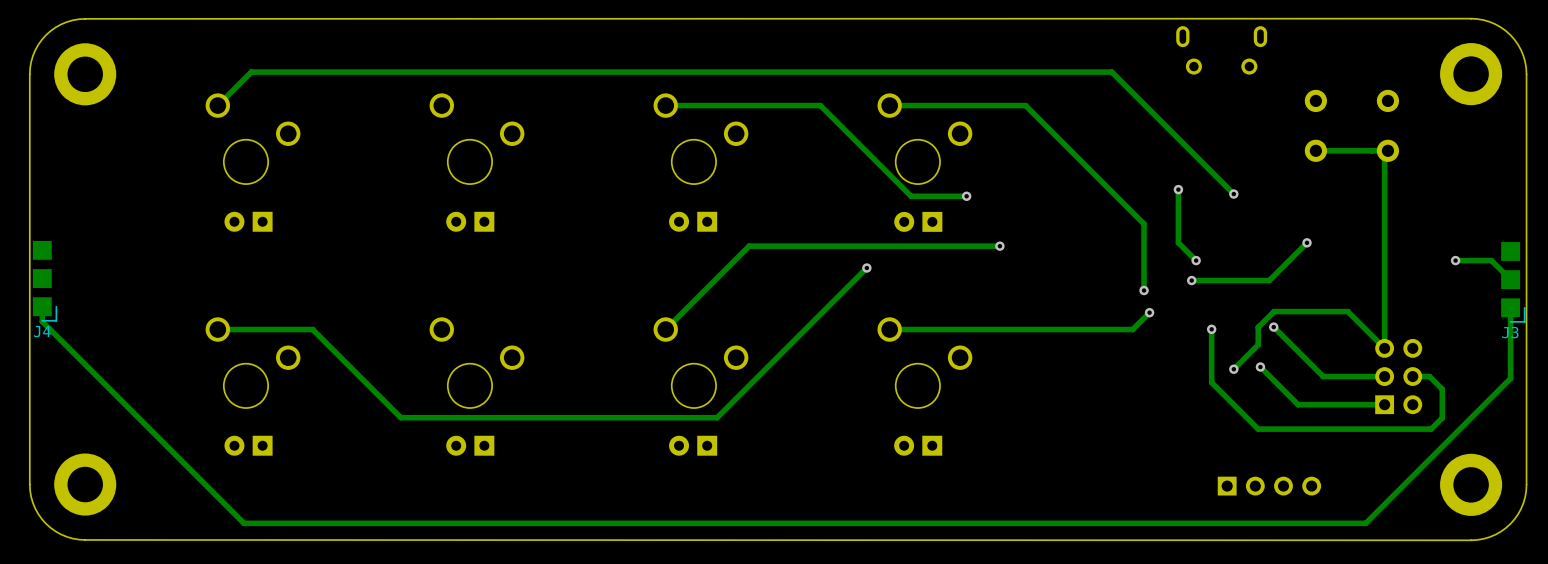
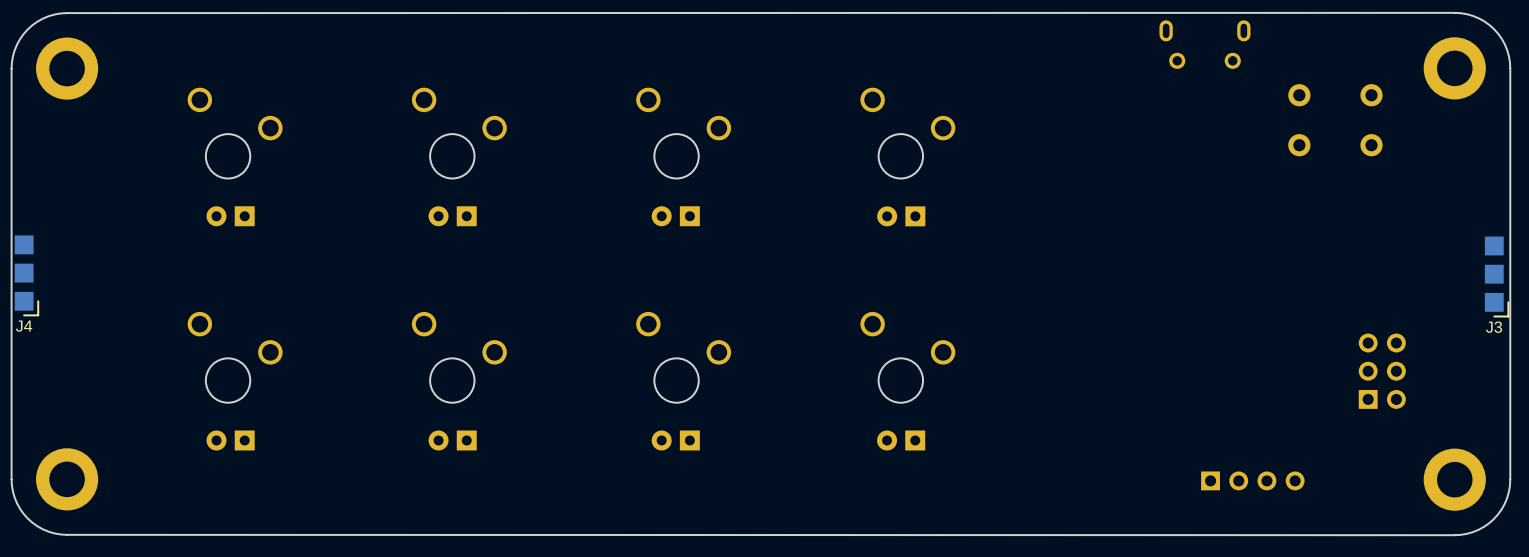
track: (217, 105) (251, 72) (1111, 72) (1233, 194) -> none
track: (665, 105) (820, 105) (911, 196) (966, 196) -> none
track: (889, 105) (1025, 105) (1144, 223) (1144, 290) -> none
track: (1315, 150) (1387, 150) (1384, 154) (1384, 348) (1347, 311) (1274, 311) (1258, 327) (1258, 344) (1233, 369) -> none
track: (1178, 189) (1178, 242) (1196, 260) -> none
via: (1178, 189) -> none
via: (1233, 194) -> none
via: (966, 196) -> none
track: (1307, 242) (1269, 280) (1191, 280) -> none
via: (1307, 242) -> none
track: (999, 246) (749, 246) (665, 329) -> none
via: (999, 246) -> none
via: (1196, 260) -> none
track: (1455, 260) (1491, 260) (1510, 279) -> none
via: (1455, 260) -> none
track: (866, 268) (717, 417) (400, 417) (312, 329) (217, 329) -> none
via: (866, 268) -> none
via: (1191, 280) -> none
via: (1144, 290) -> none
track: (42, 306) (42, 321) (243, 523) (1365, 523) (1510, 378) (1509, 307) -> none
track: (1149, 312) (1132, 329) (889, 329) -> none
via: (1149, 312) -> none
track: (1273, 327) (1323, 376) (1384, 376) -> none
via: (1273, 327) -> none
track: (1211, 329) (1211, 382) (1258, 429) (1431, 429) (1442, 418) (1442, 389) (1429, 376) (1412, 376) -> none
via: (1211, 329) -> none
track: (1260, 367) (1298, 404) (1384, 404) -> none
via: (1260, 367) -> none
via: (1233, 369) -> none

